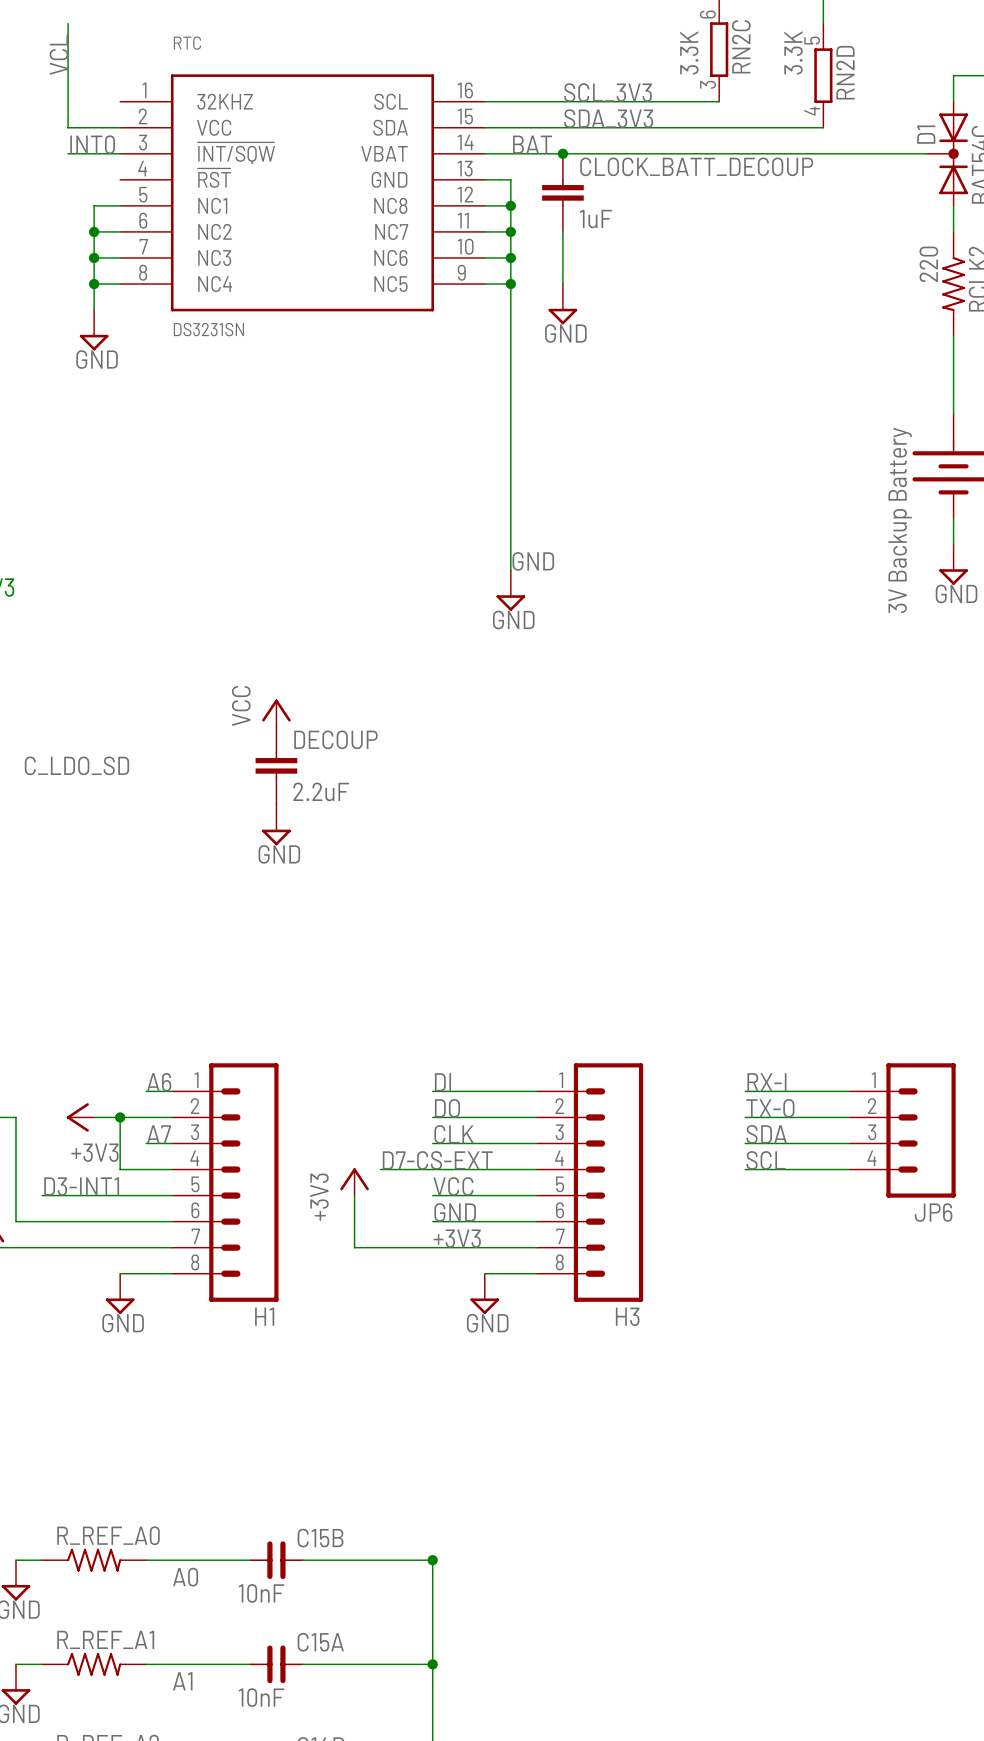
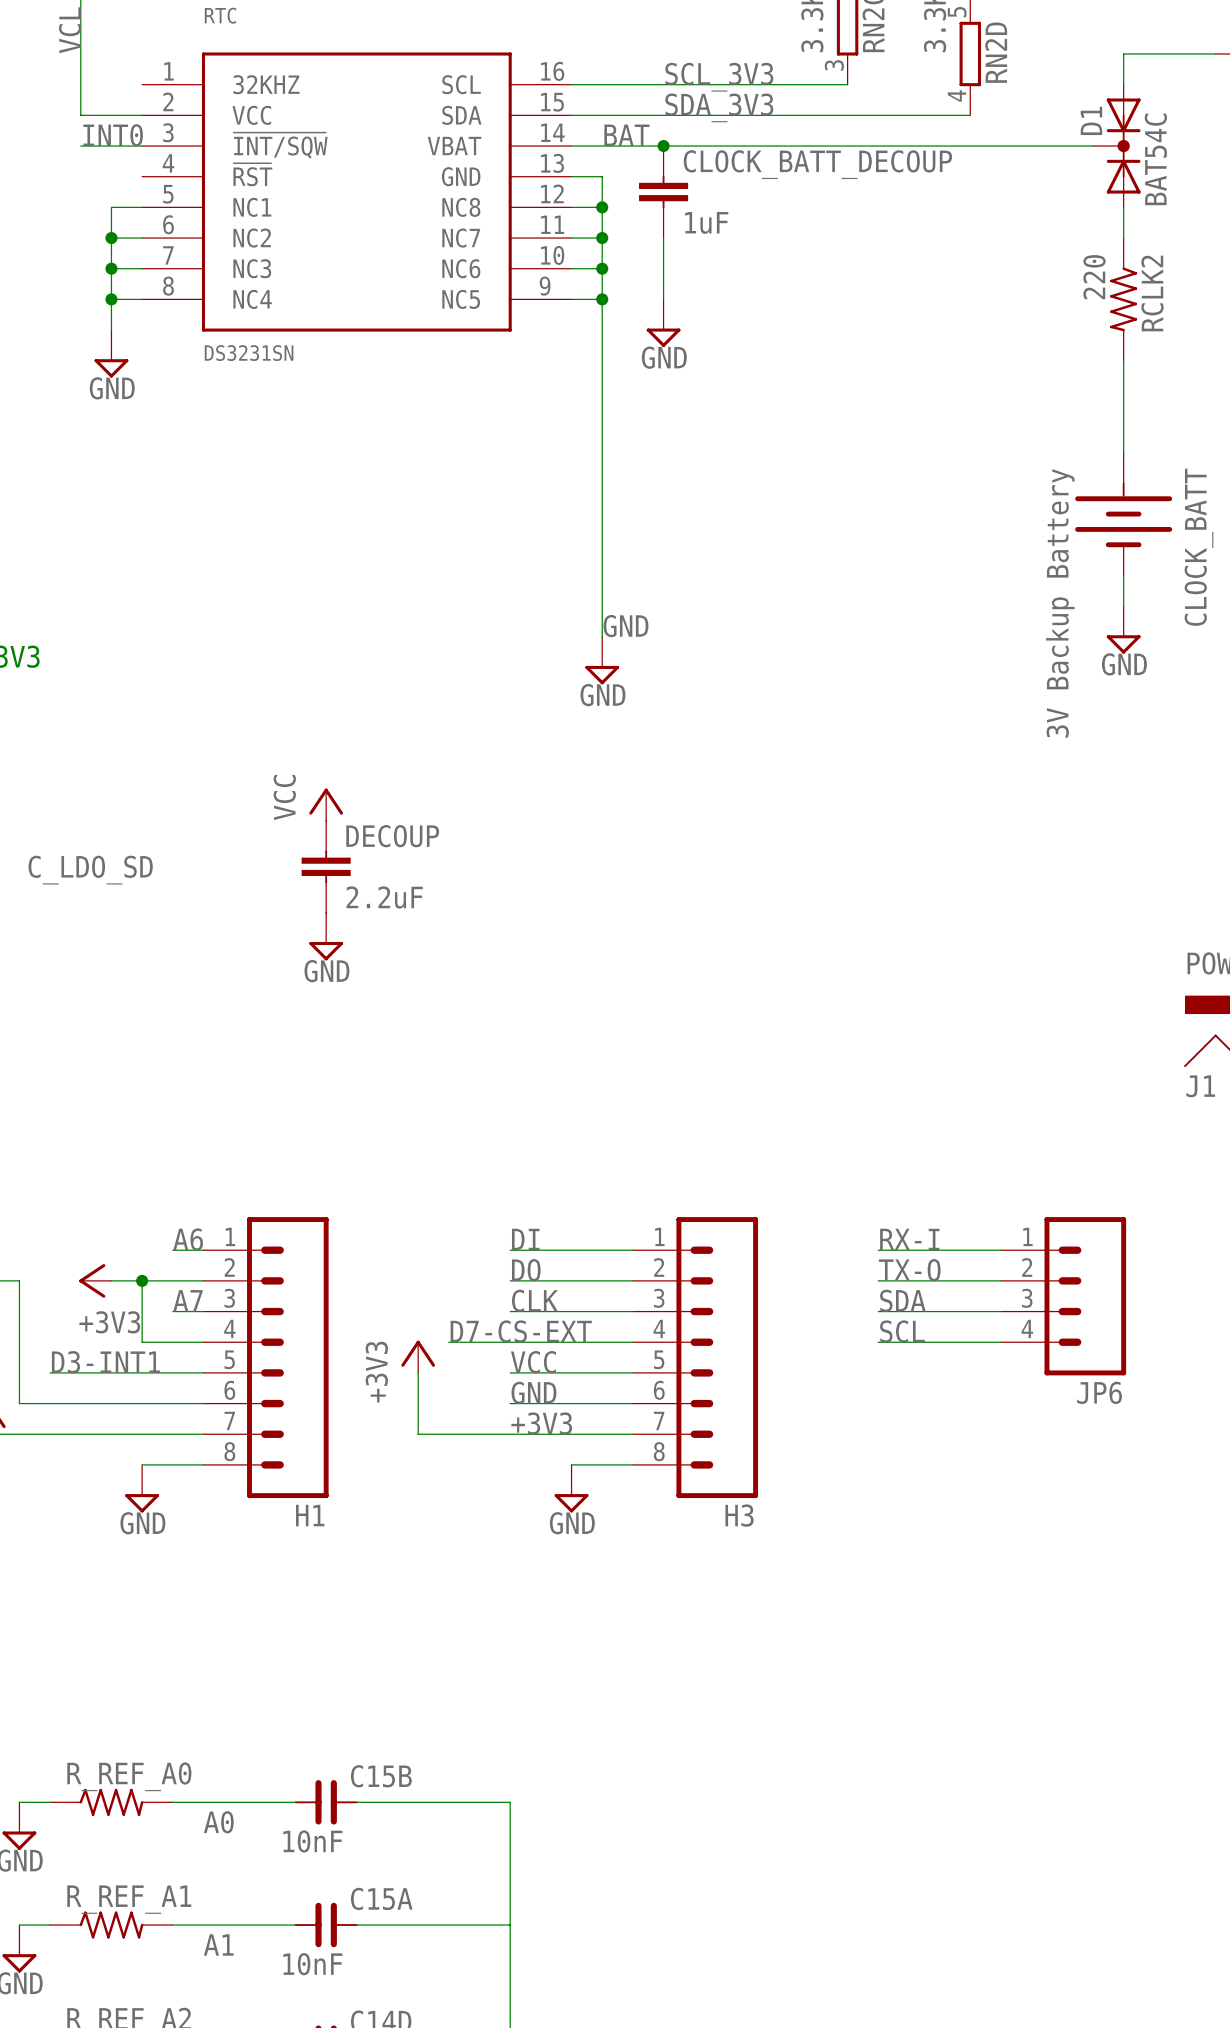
junction: (432, 1560) -> none
junction: (432, 1664) -> none

